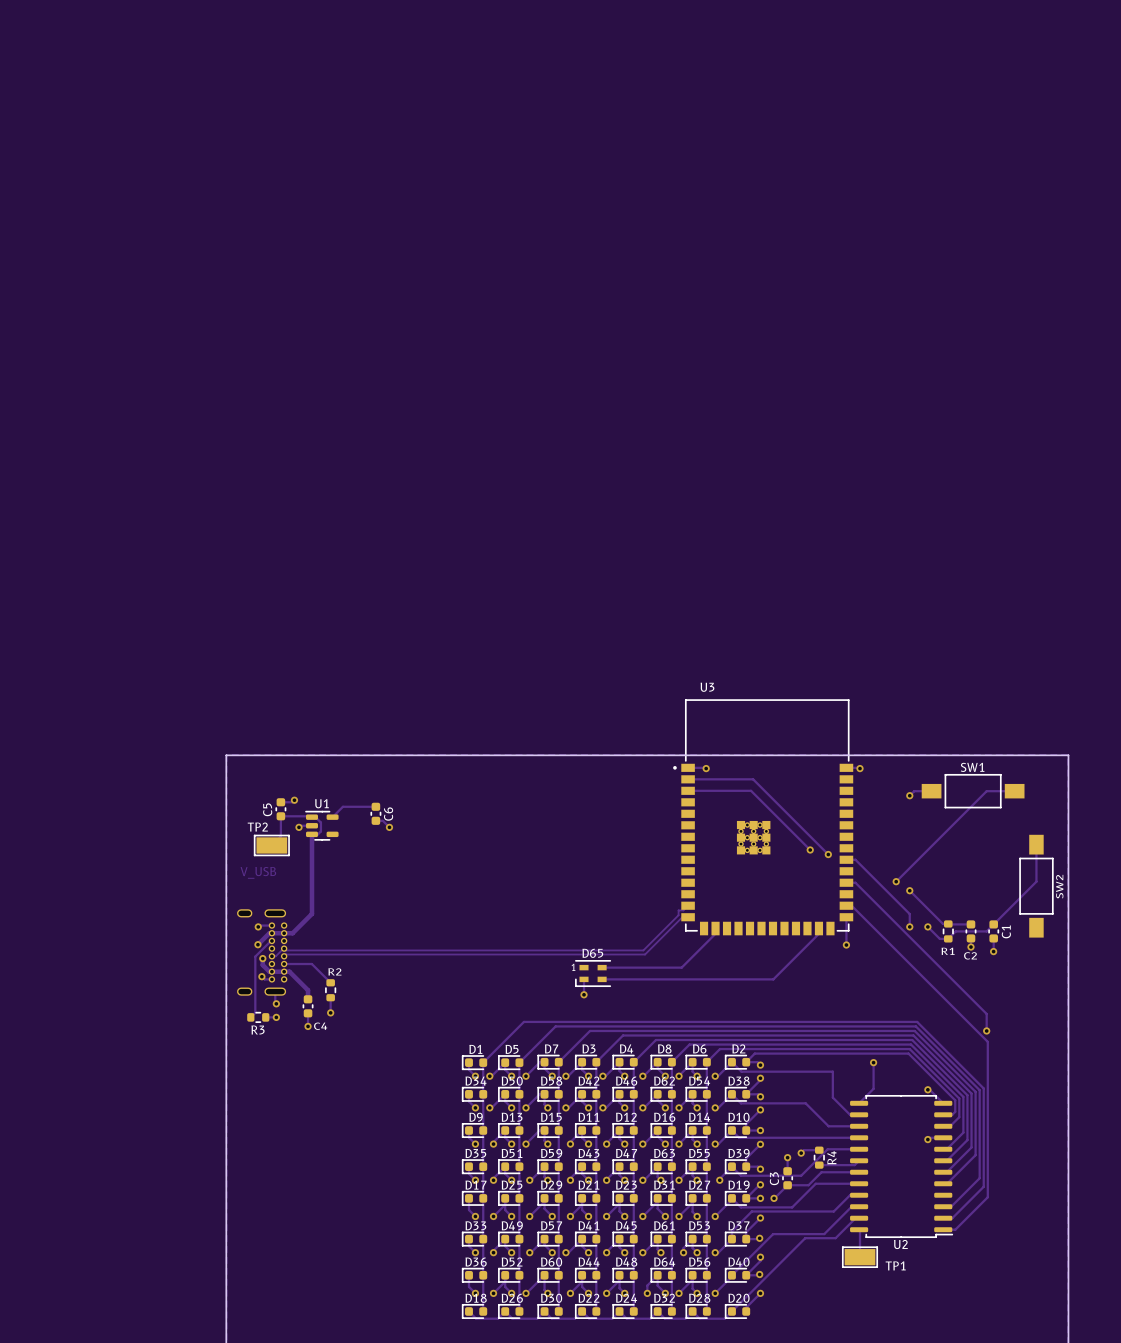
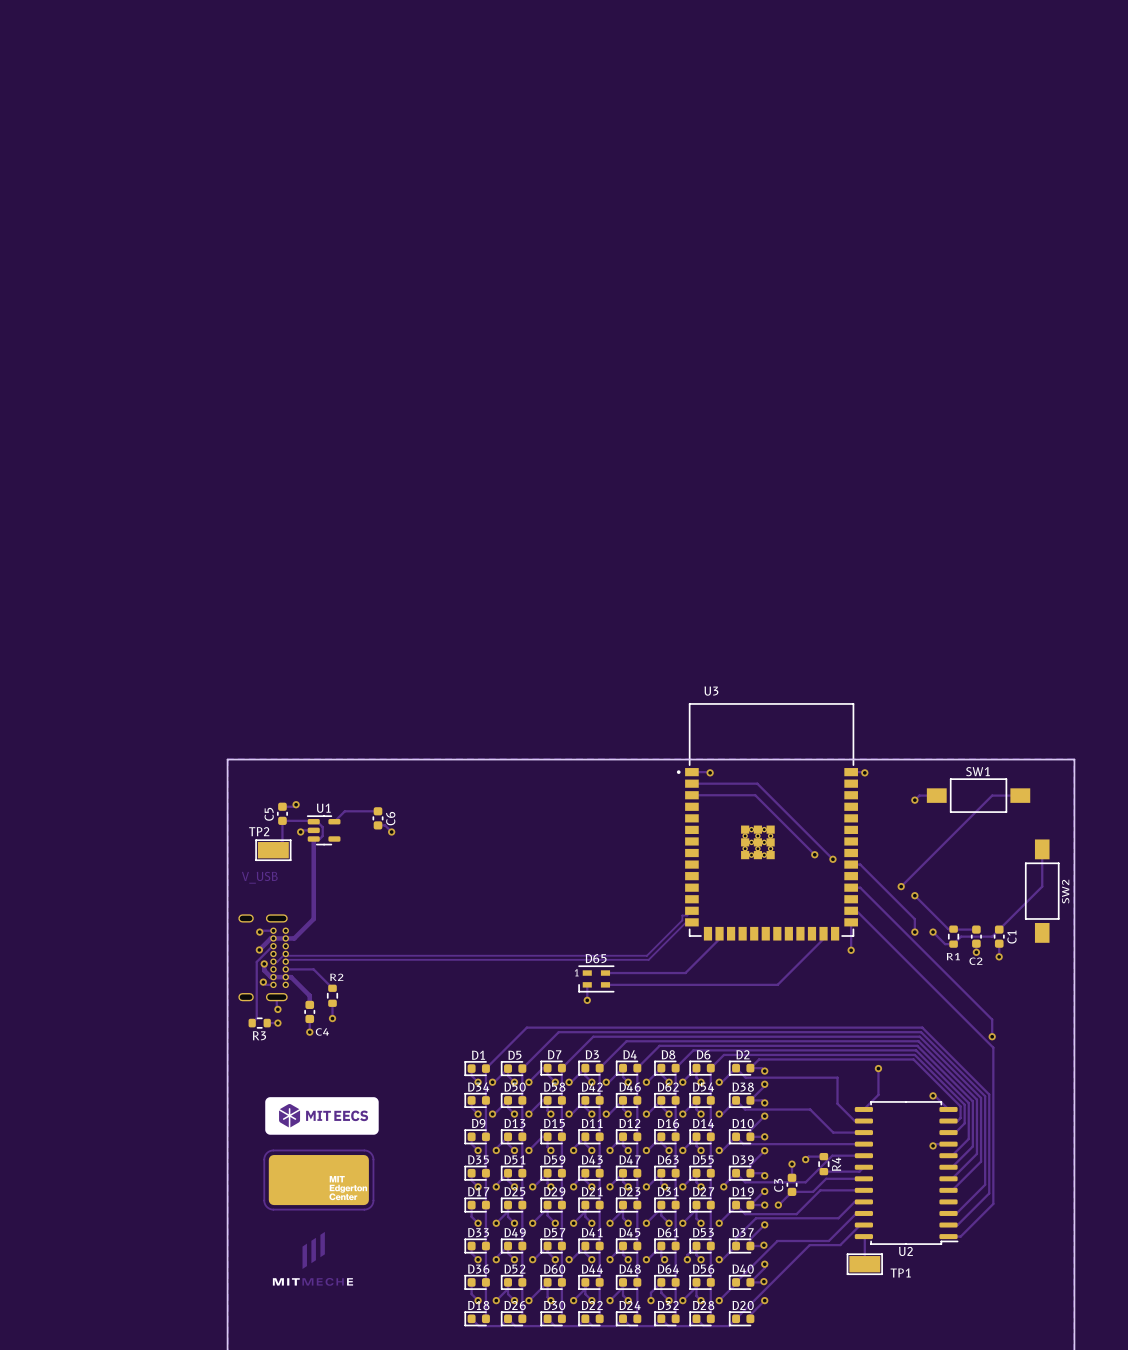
drawing: none -> [265, 1097, 379, 1135]
part: none -> (318, 1180)
drawing: none -> [272, 1231, 354, 1286]

